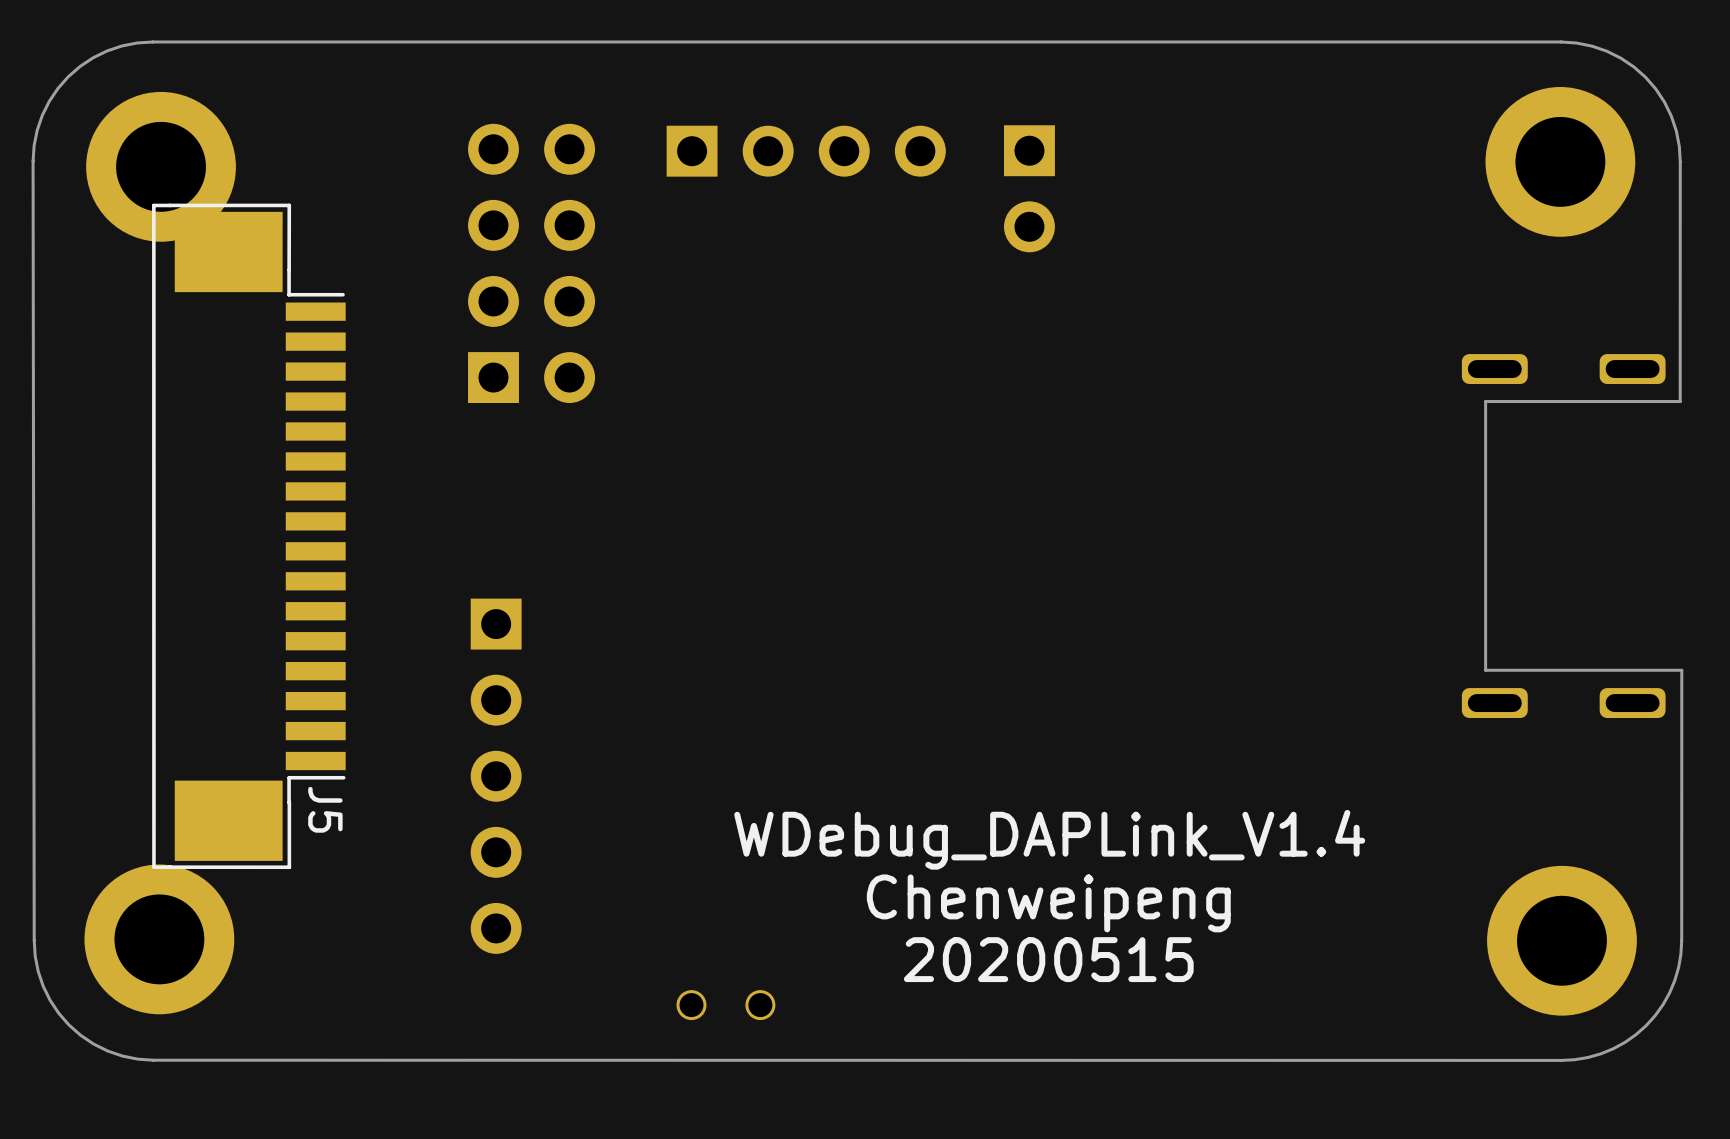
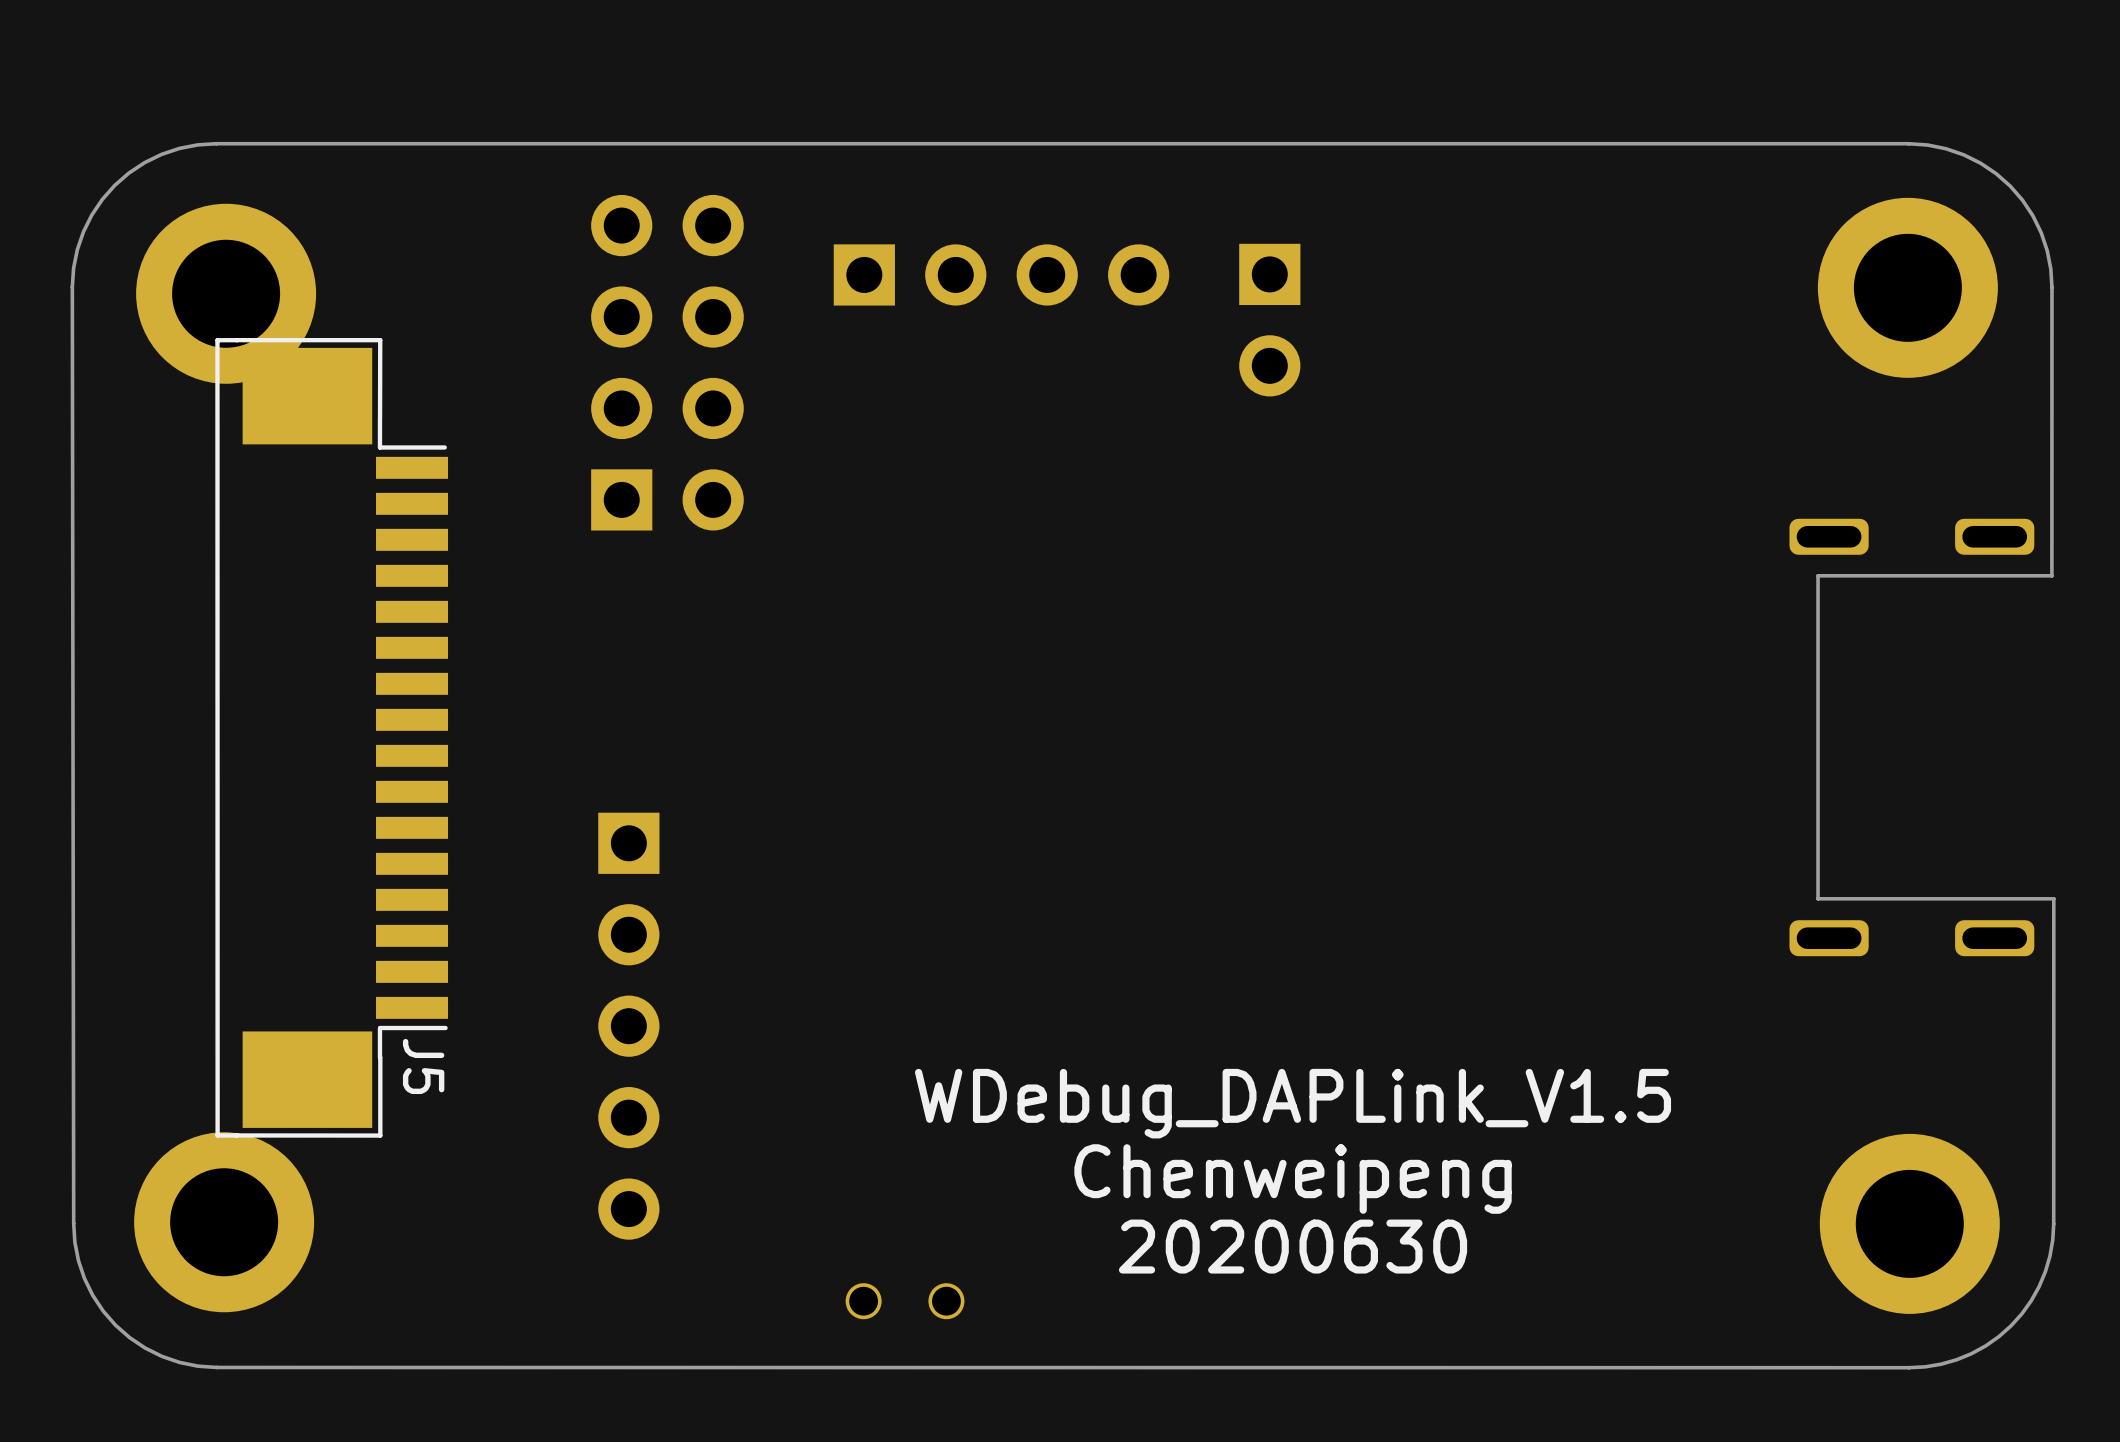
part position: (531, 263) -> (667, 362)
text: WDebug_DAPLink_V1.4 (1049, 839) -> WDebug_DAPLink_V1.5 (1293, 1103)
text: 20200515 (1048, 959) -> 20200630 (1293, 1246)

